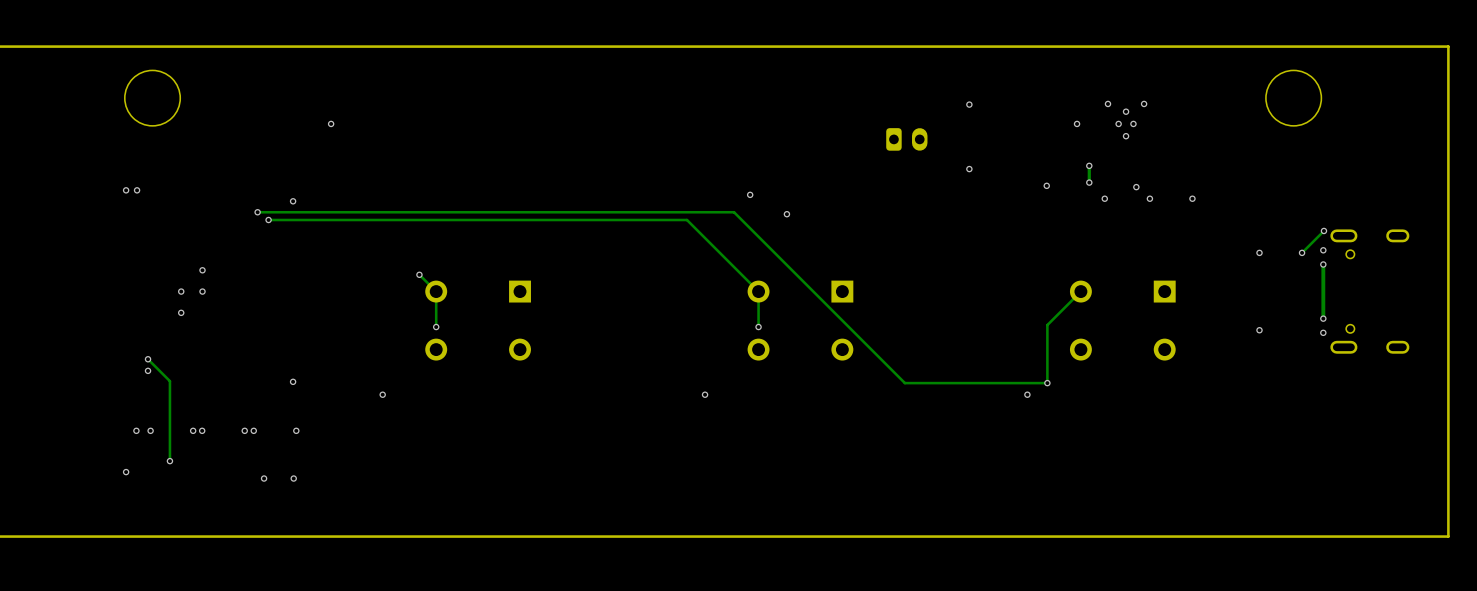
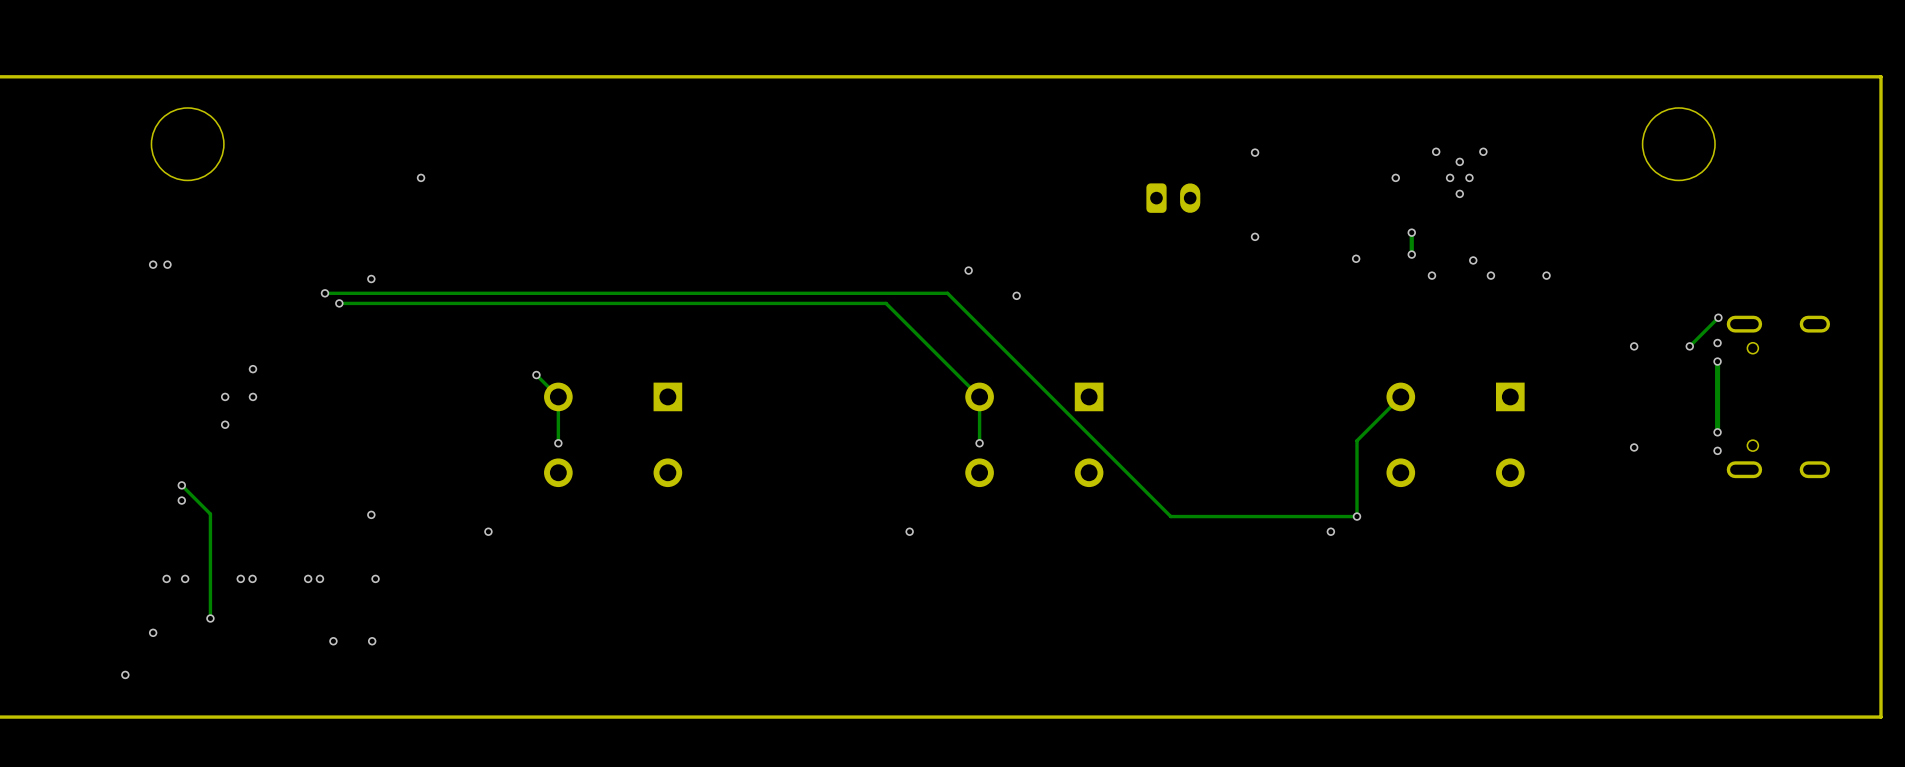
via: none -> (125, 674)

